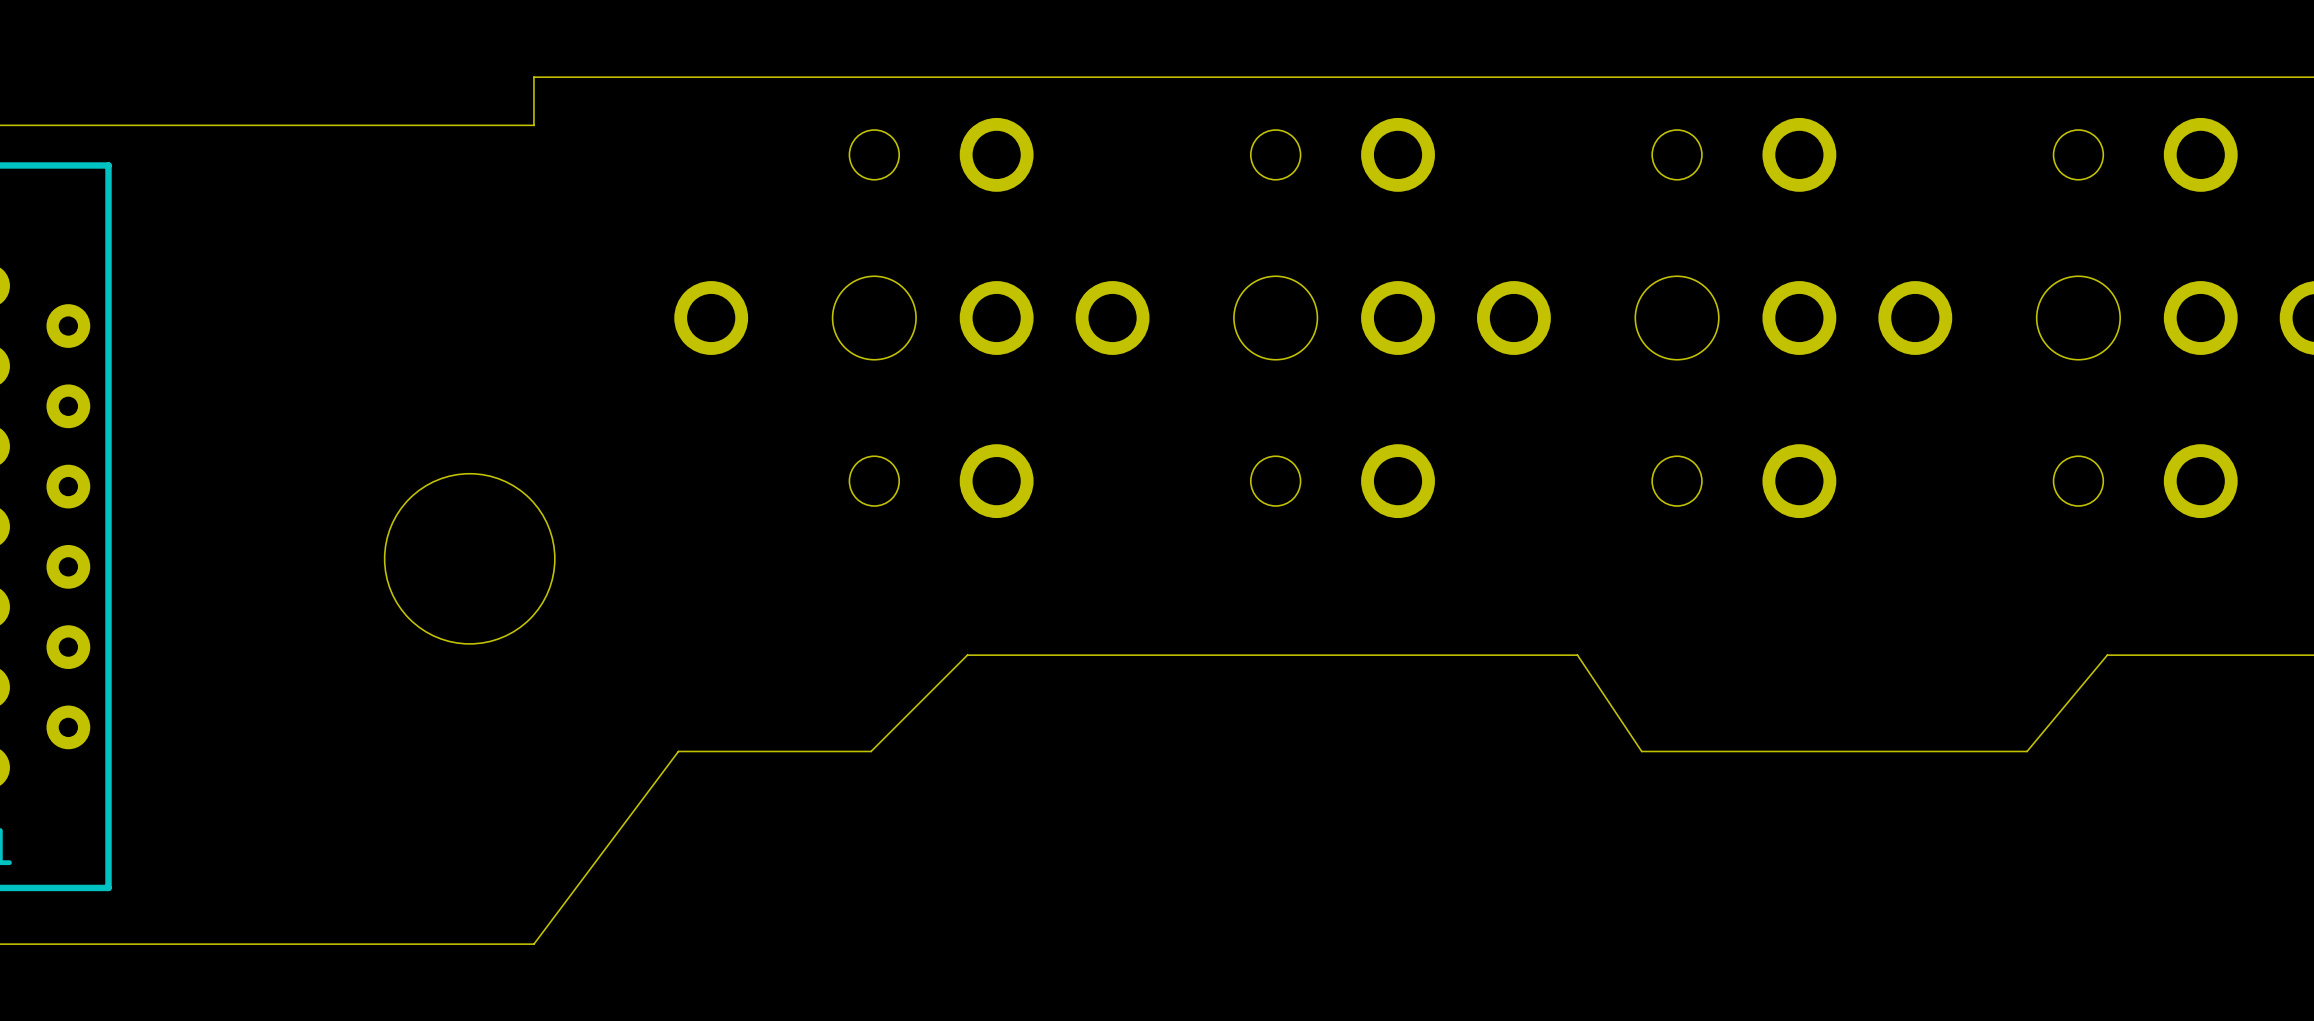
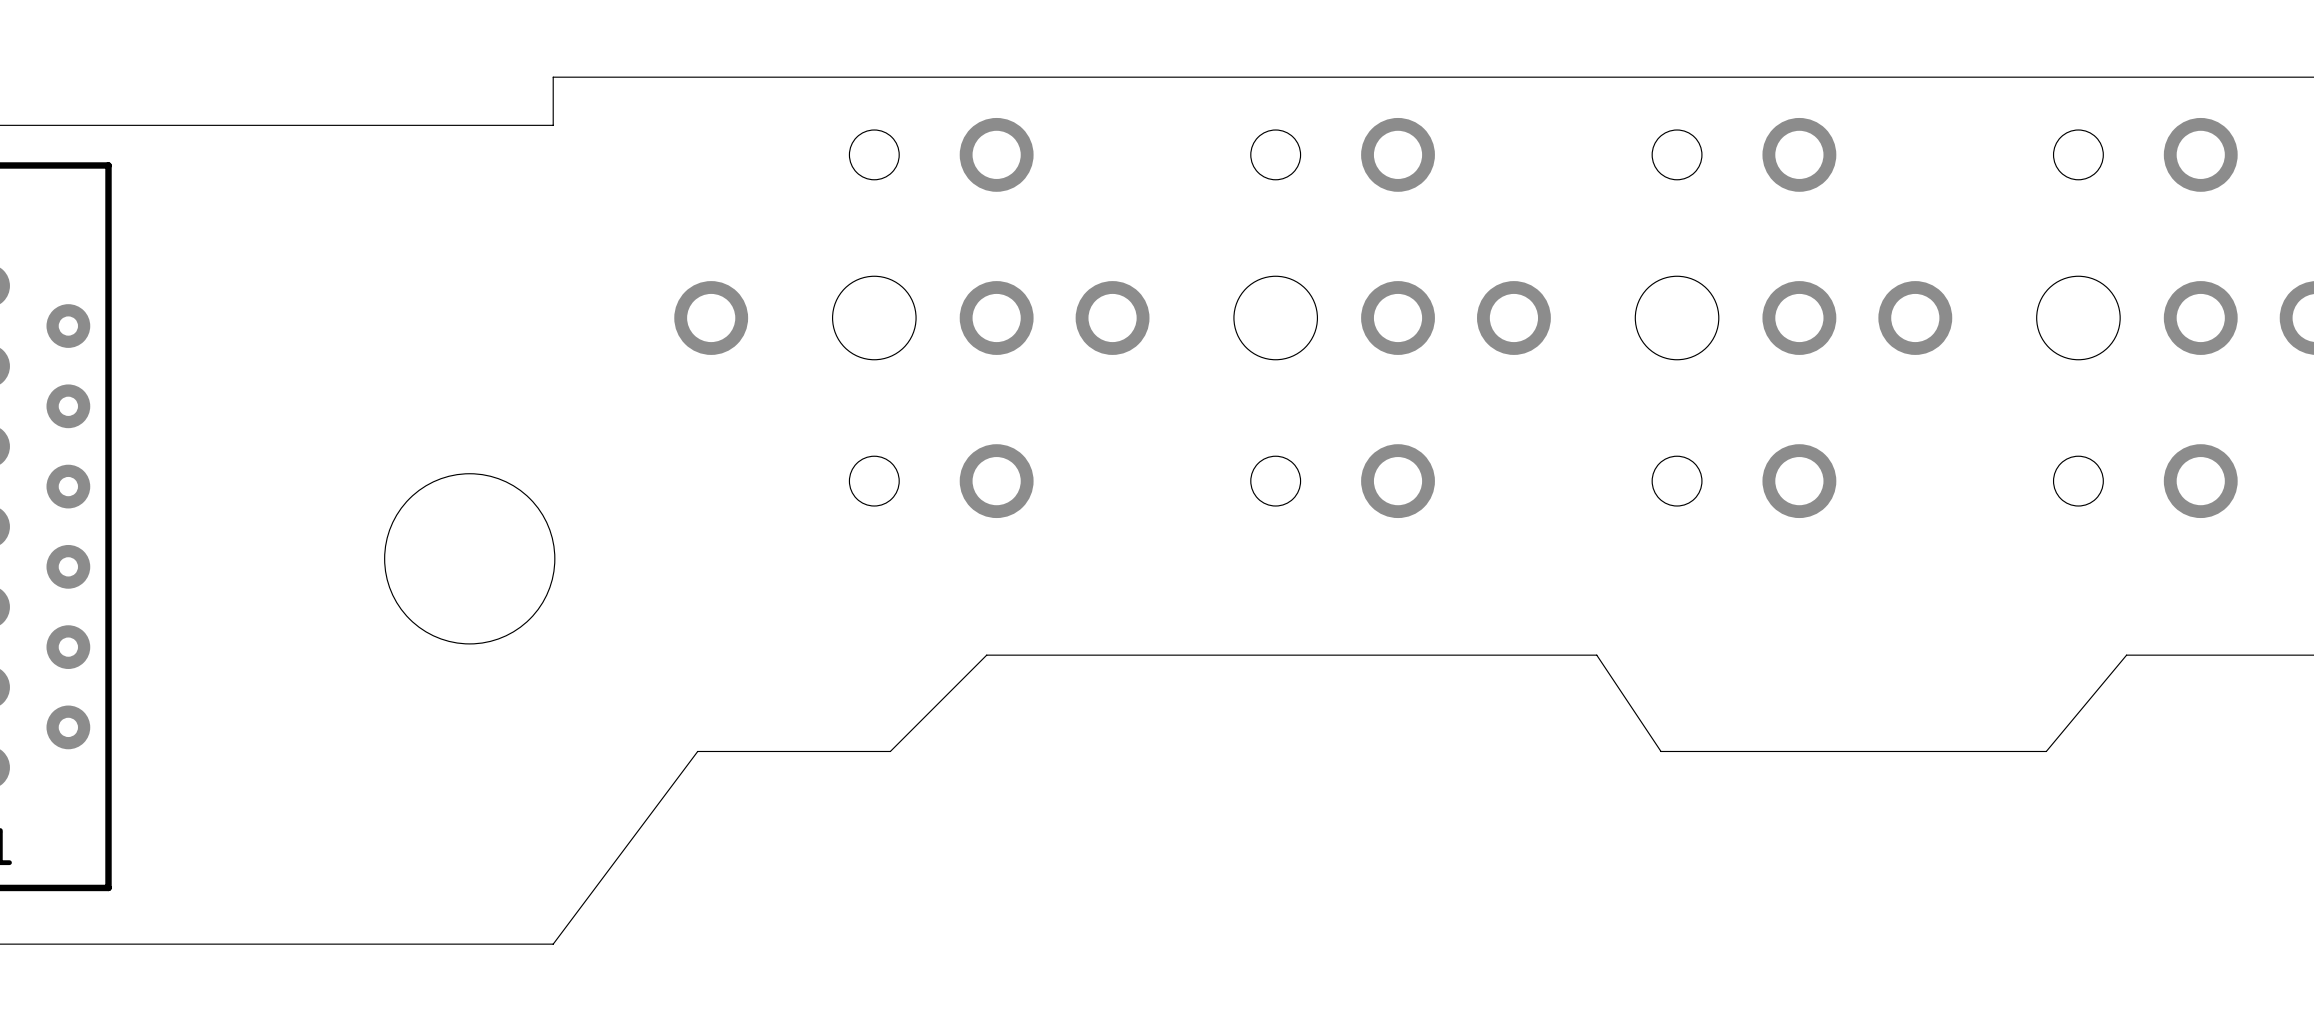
board edge: (553, 77) (533, 77) (533, 125) -> (553, 77) (553, 125) (533, 125)
board edge: (986, 655) (967, 655) (871, 751) -> (986, 655) (890, 751) (871, 751)
board edge: (1577, 655) (1641, 751) (1661, 751) -> (1577, 655) (1596, 655) (1661, 751)
board edge: (2126, 655) (2107, 655) (2027, 751) -> (2126, 655) (2046, 751) (2027, 751)
board edge: (697, 751) (678, 751) (533, 944) -> (697, 751) (553, 944) (533, 944)

